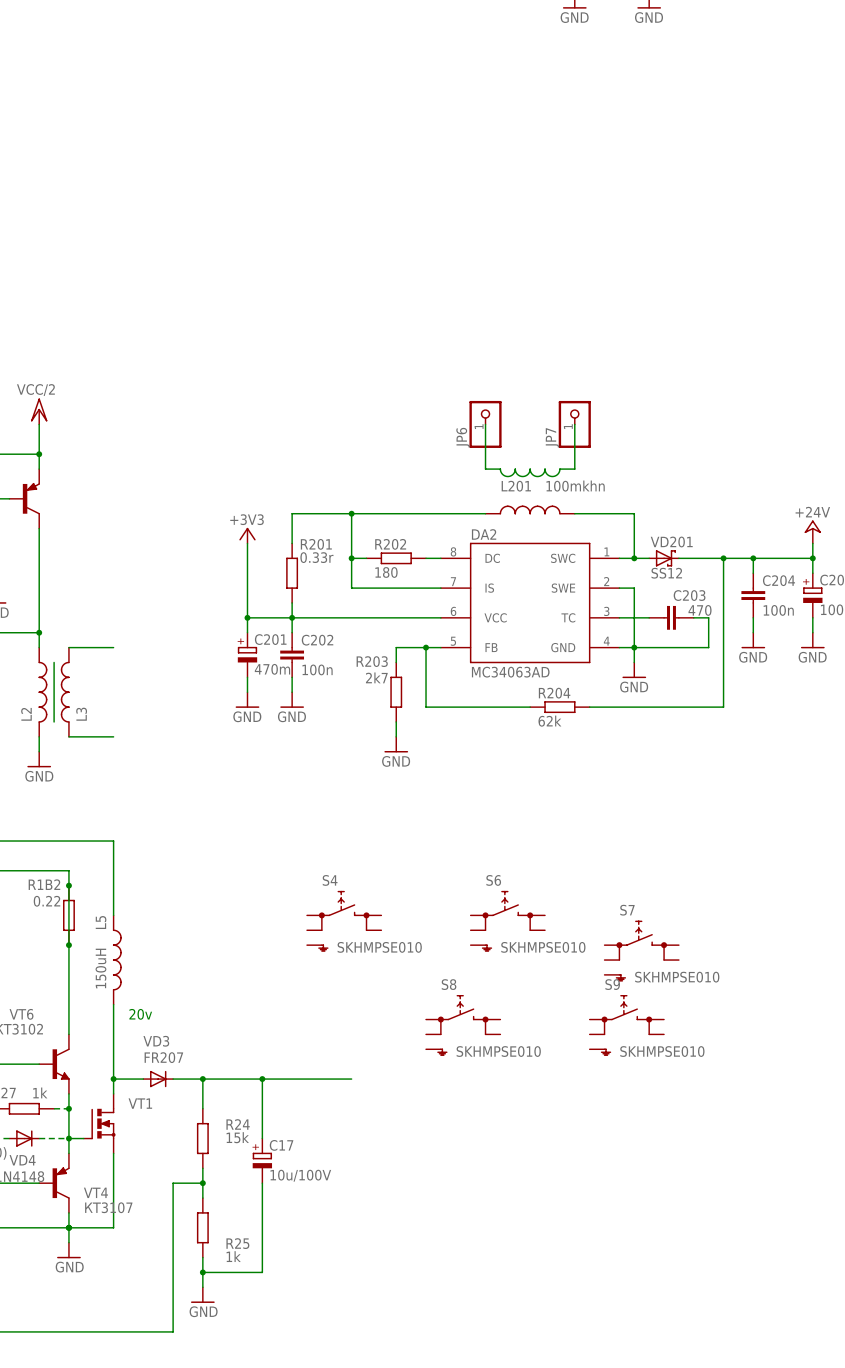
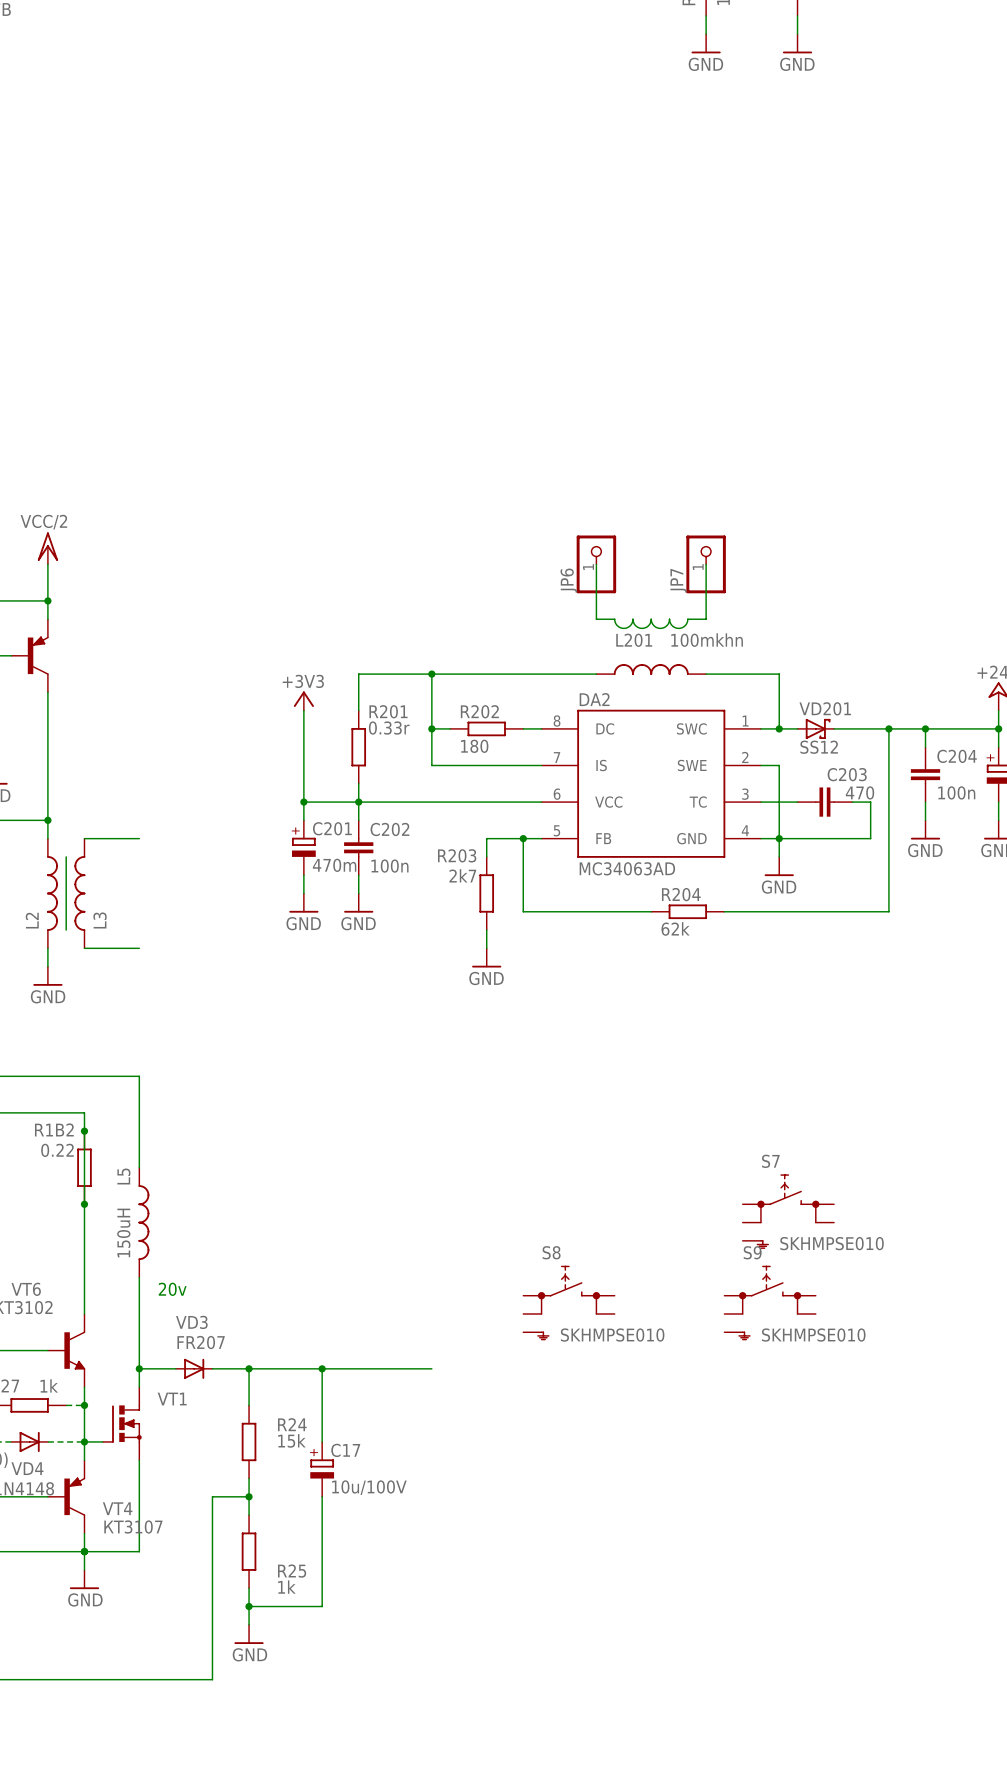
S4: SKHMPSE010 (344, 921) -> none
S6: SKHMPSE010 (507, 921) -> none

